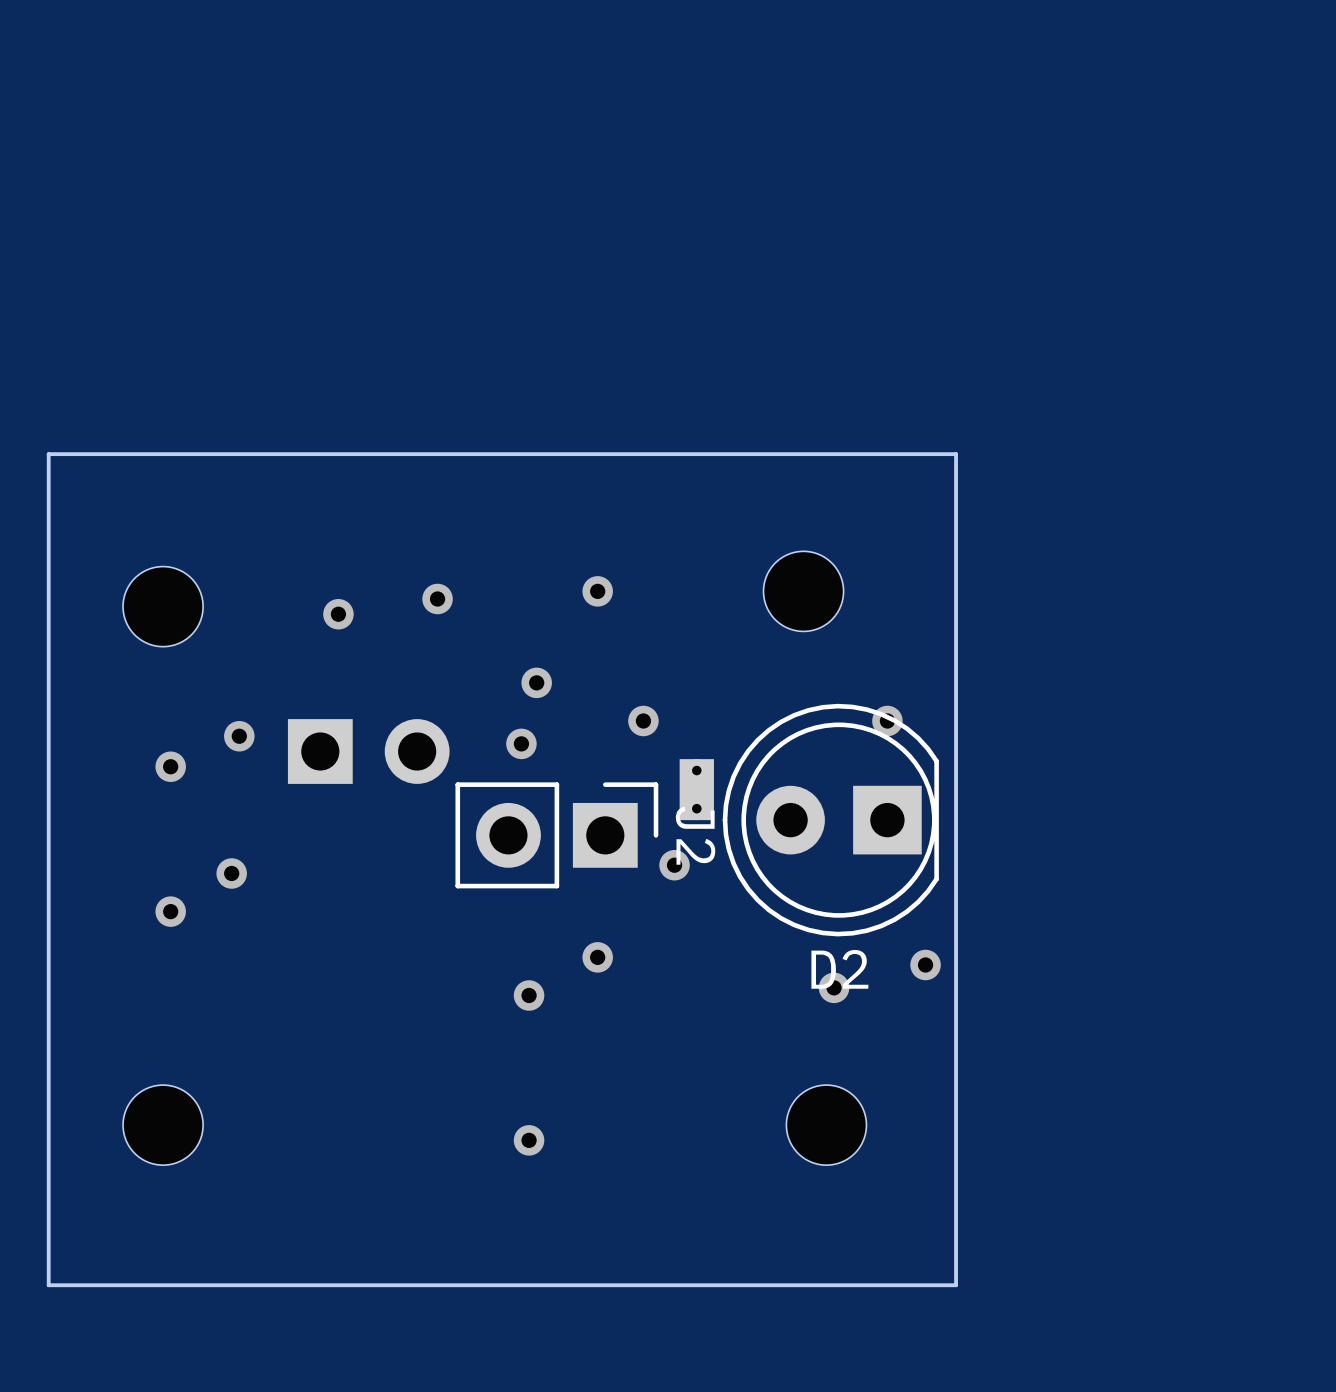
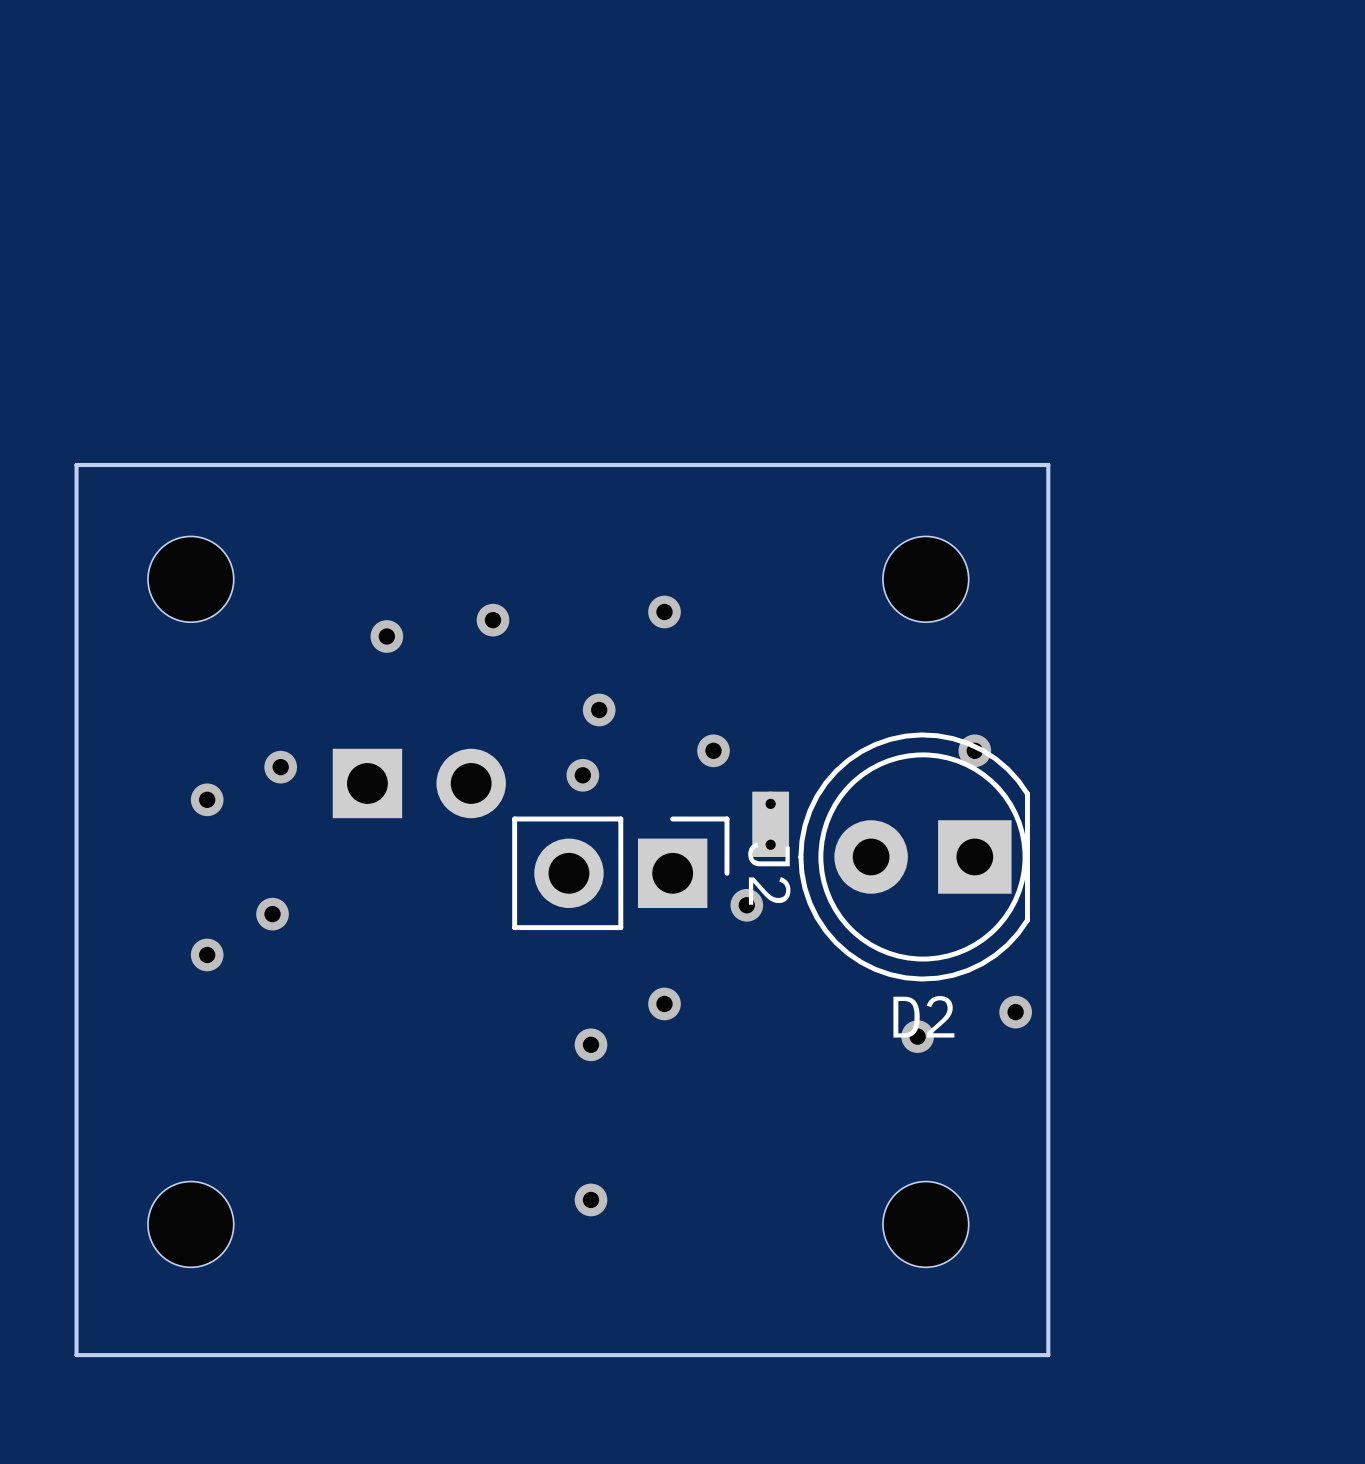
part position: (803, 591) -> (925, 579)
part position: (163, 606) -> (190, 579)
part position: (163, 1125) -> (190, 1224)
part position: (826, 1125) -> (925, 1224)

